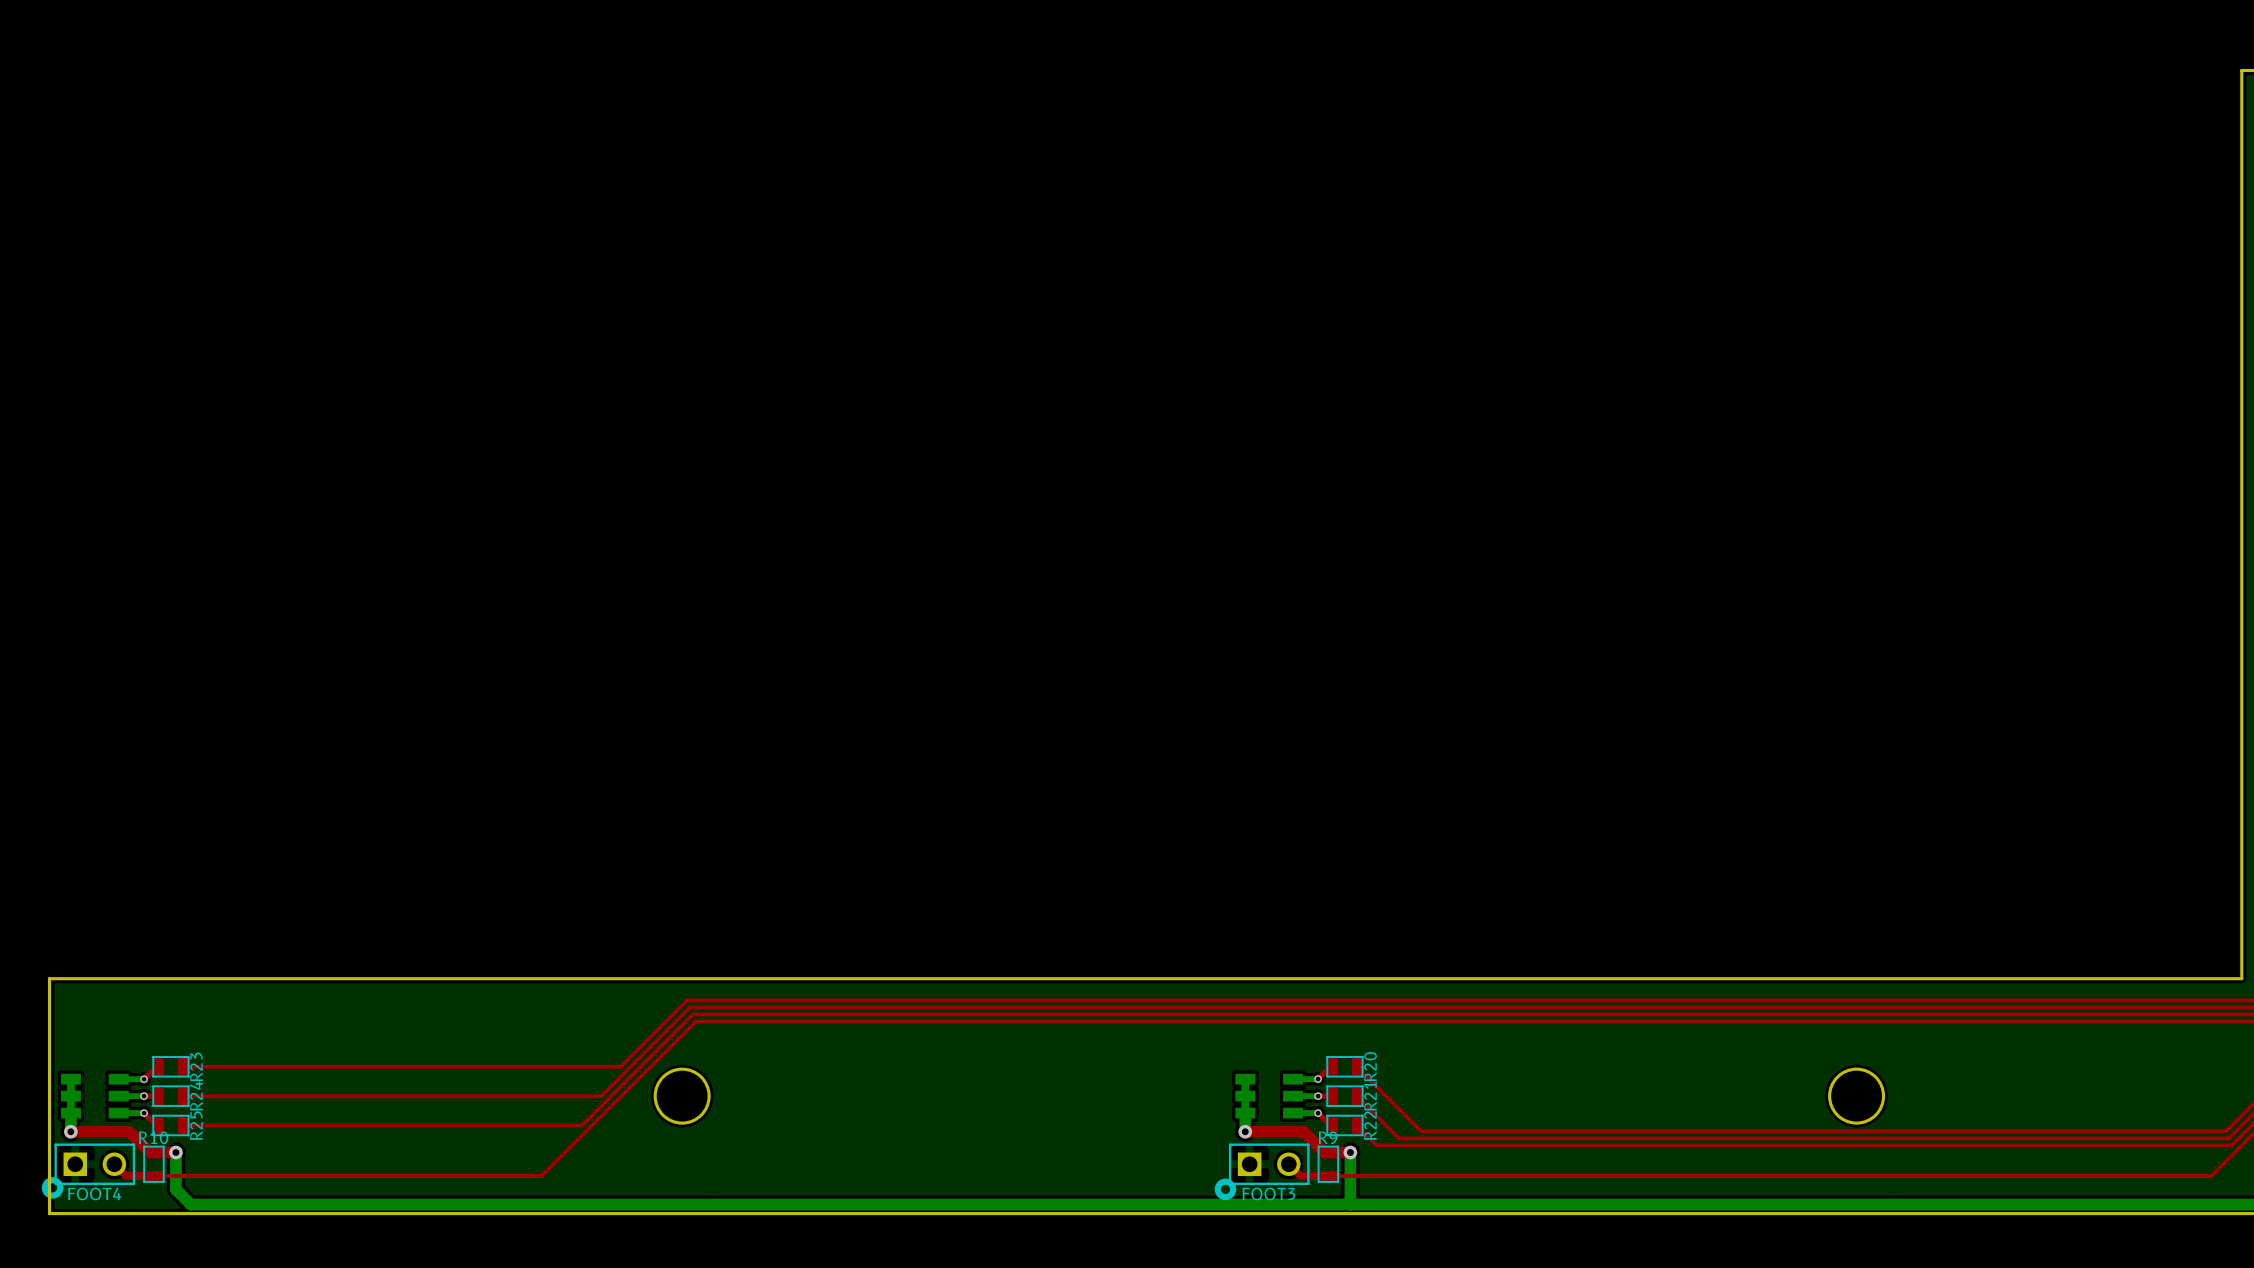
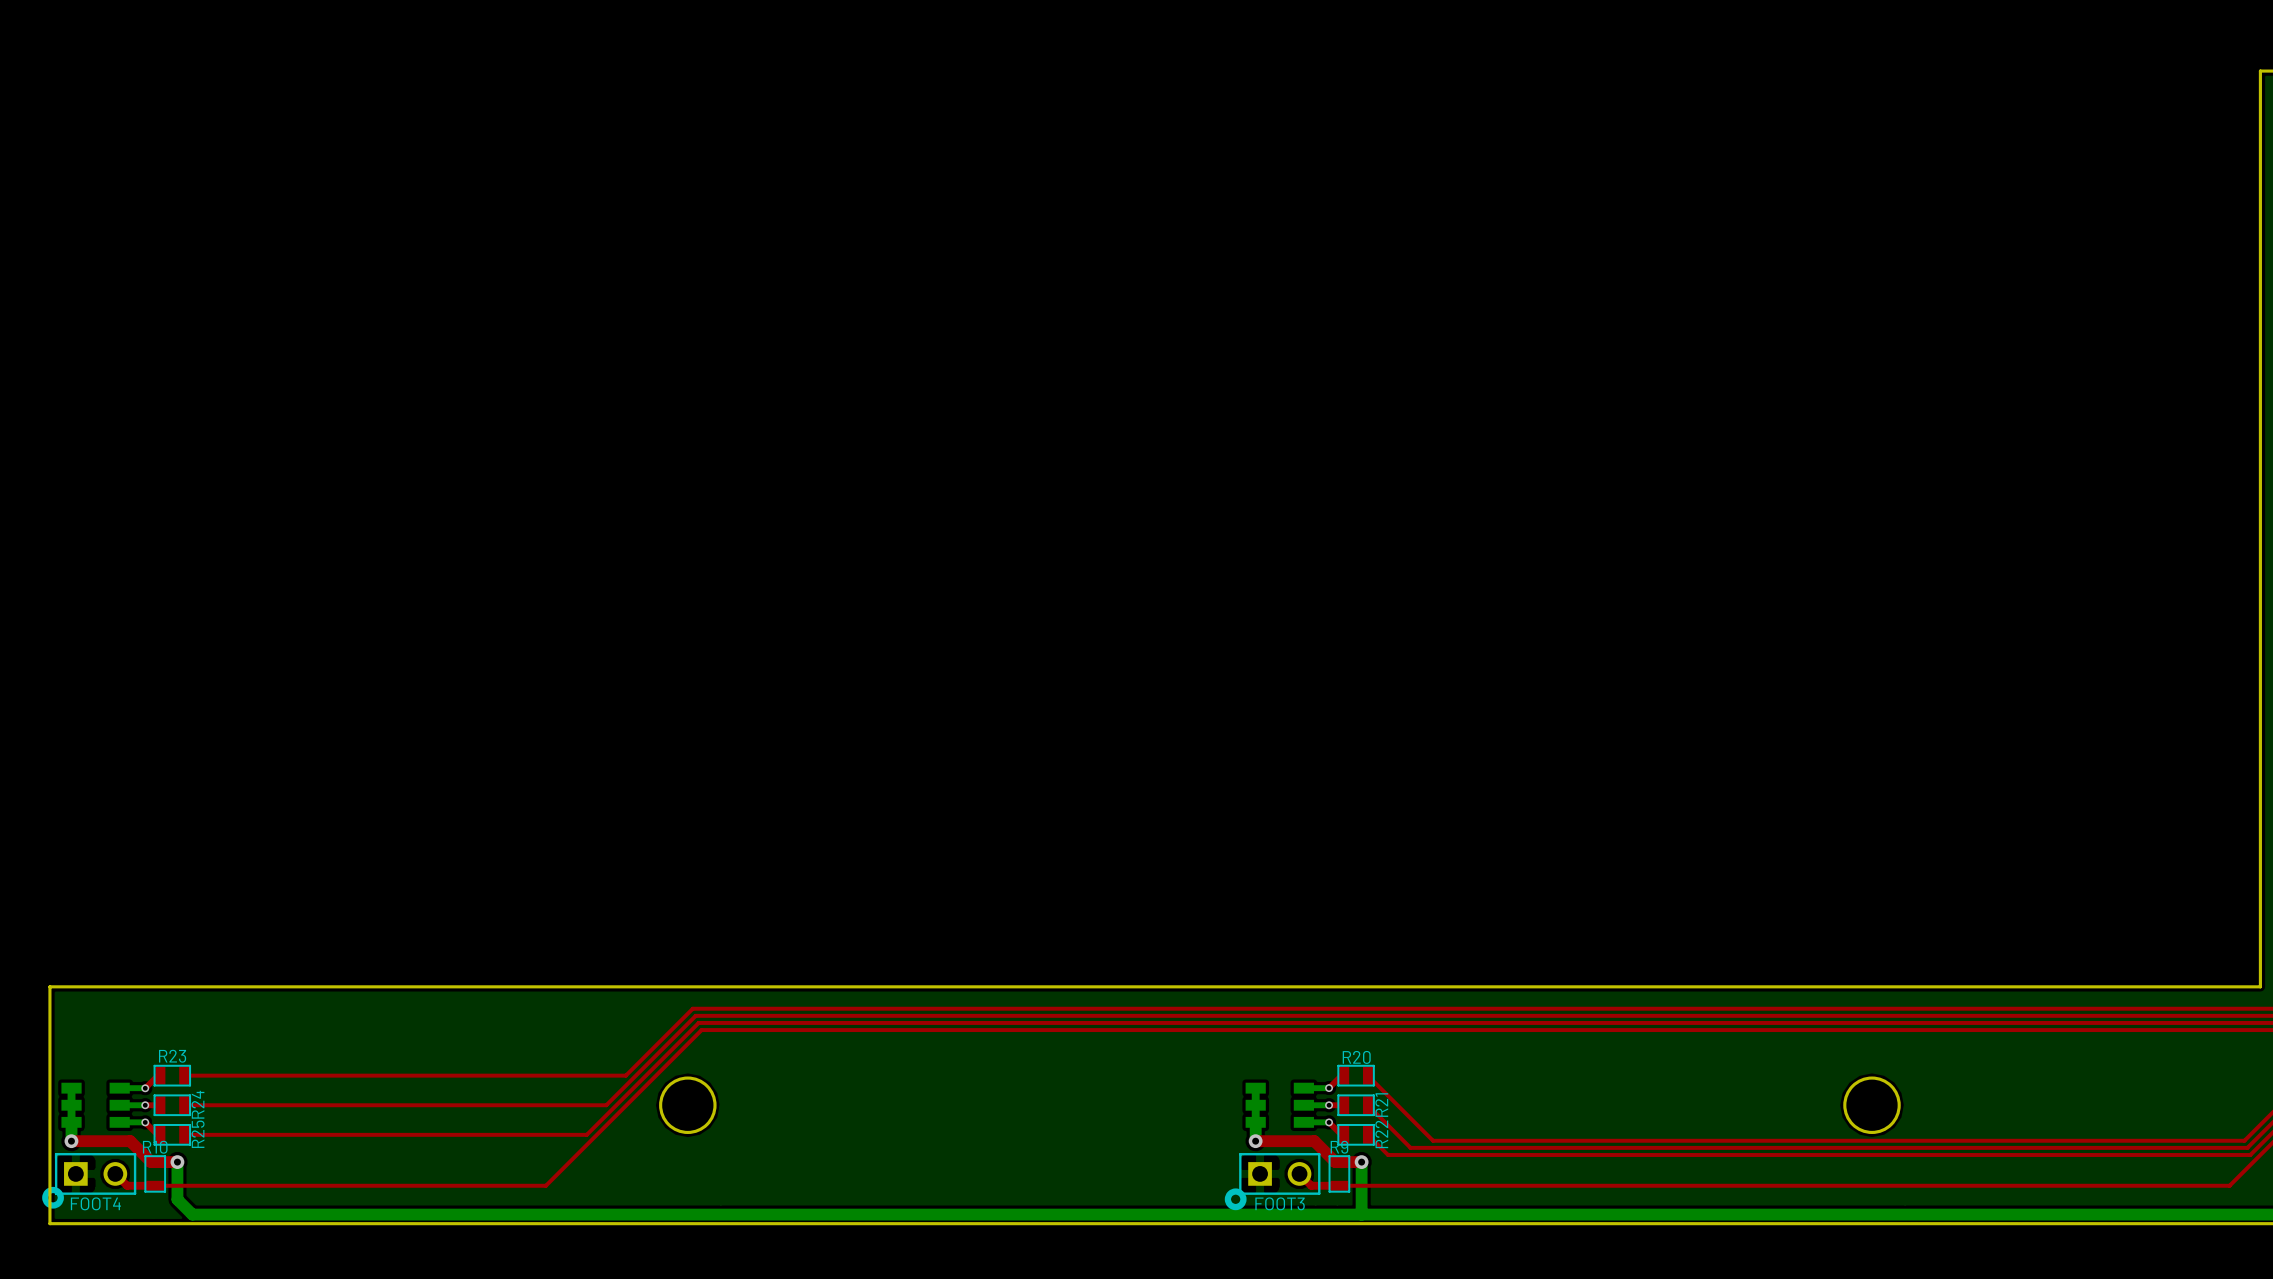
R23 name rotation: 0° (196, 1066) -> 90° clockwise (172, 1056)
R20 name rotation: 0° (1370, 1066) -> 90° clockwise (1356, 1057)

